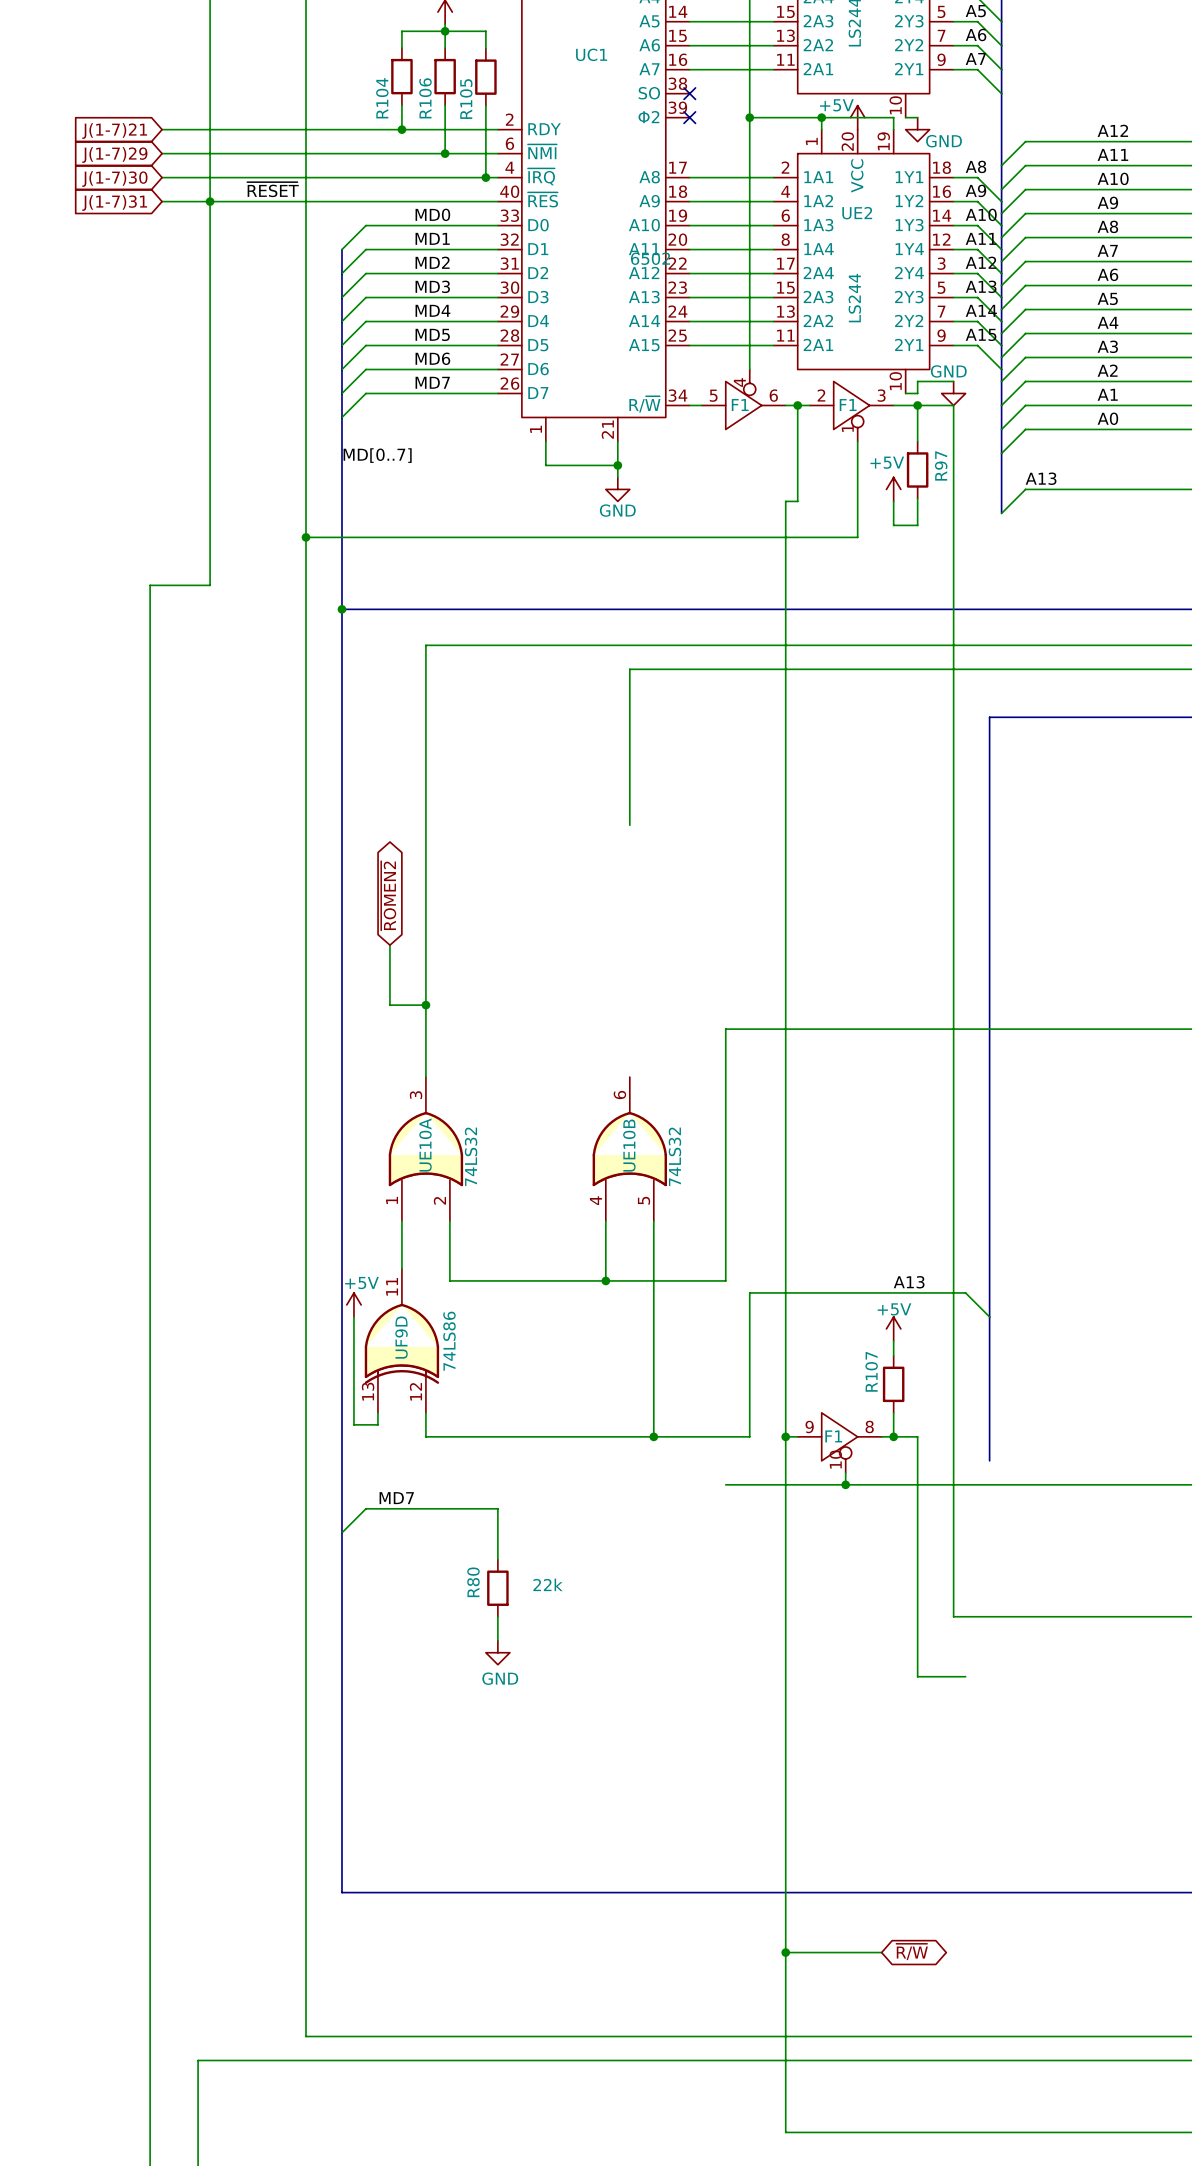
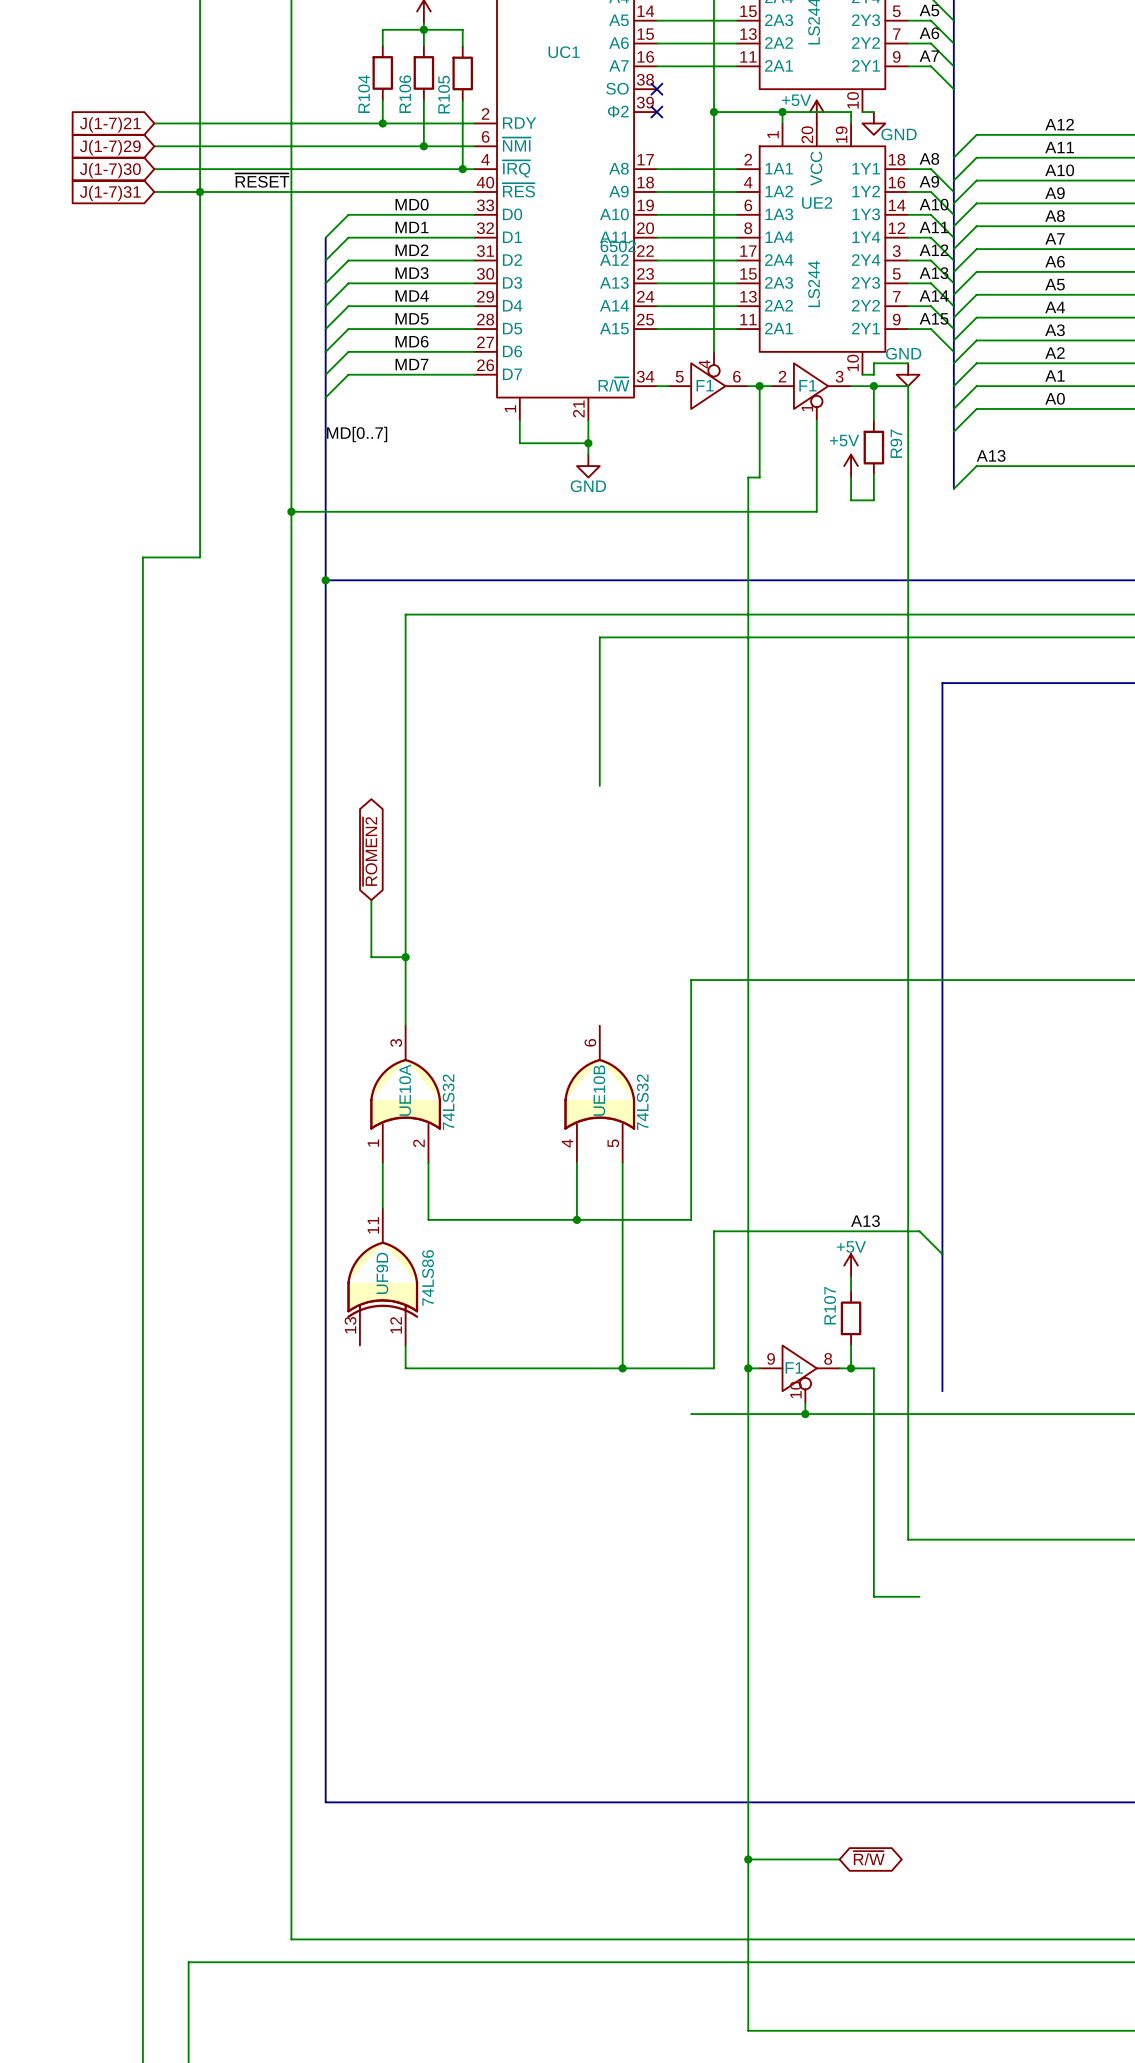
power symbol: +5V (353, 1304) -> none
wire: (353, 1316) (353, 1424) (377, 1424) (377, 1412) -> none
label: MD7 (396, 1498) -> none
wire: (341, 1532) (365, 1508) (497, 1508) (497, 1559) -> none
R80: 22k (497, 1588) -> none
wire: (497, 1616) (497, 1640) -> none
power symbol: GND (497, 1652) -> none

